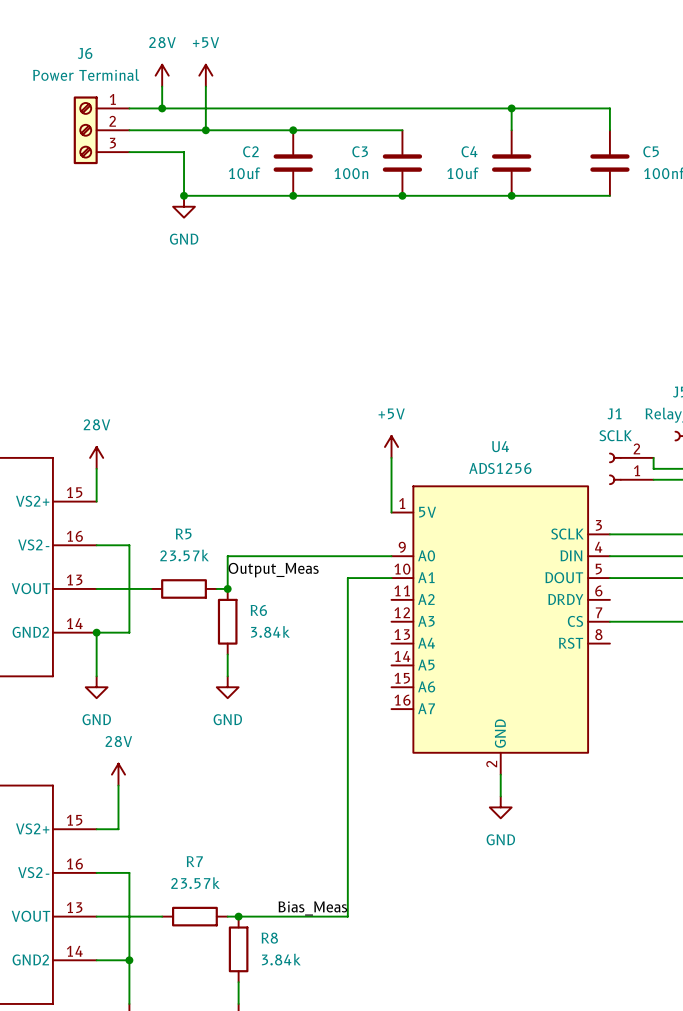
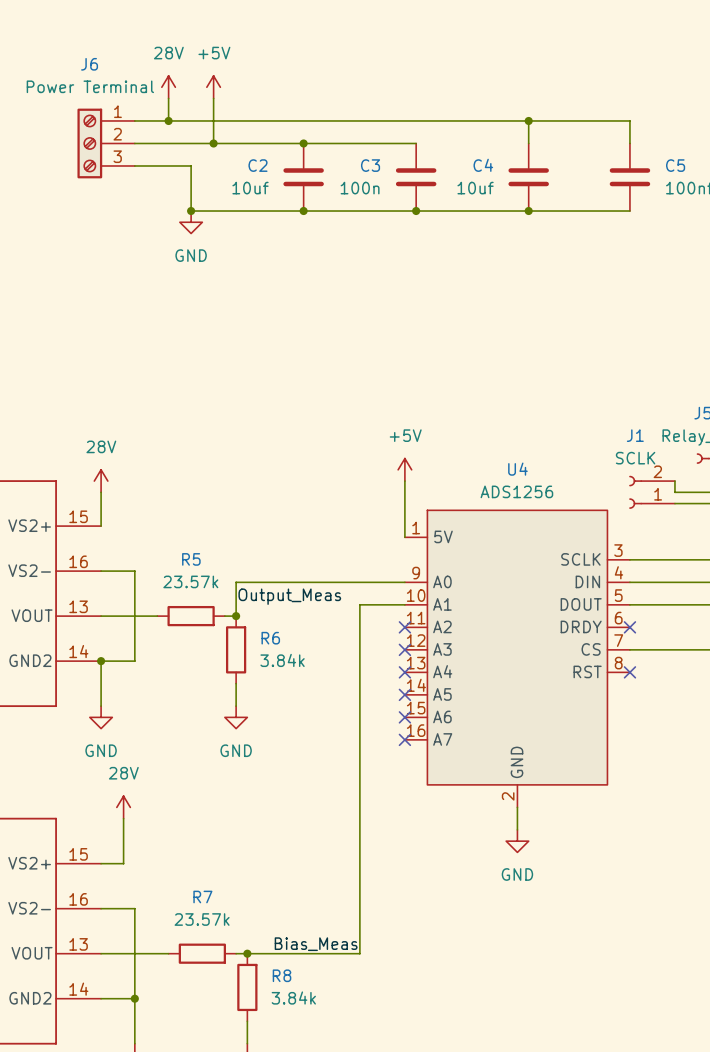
no-connect mark: none -> (404, 627)
no-connect mark: none -> (629, 627)
no-connect mark: none -> (404, 649)
no-connect mark: none -> (404, 672)
no-connect mark: none -> (629, 672)
no-connect mark: none -> (404, 694)
no-connect mark: none -> (404, 717)
no-connect mark: none -> (404, 739)

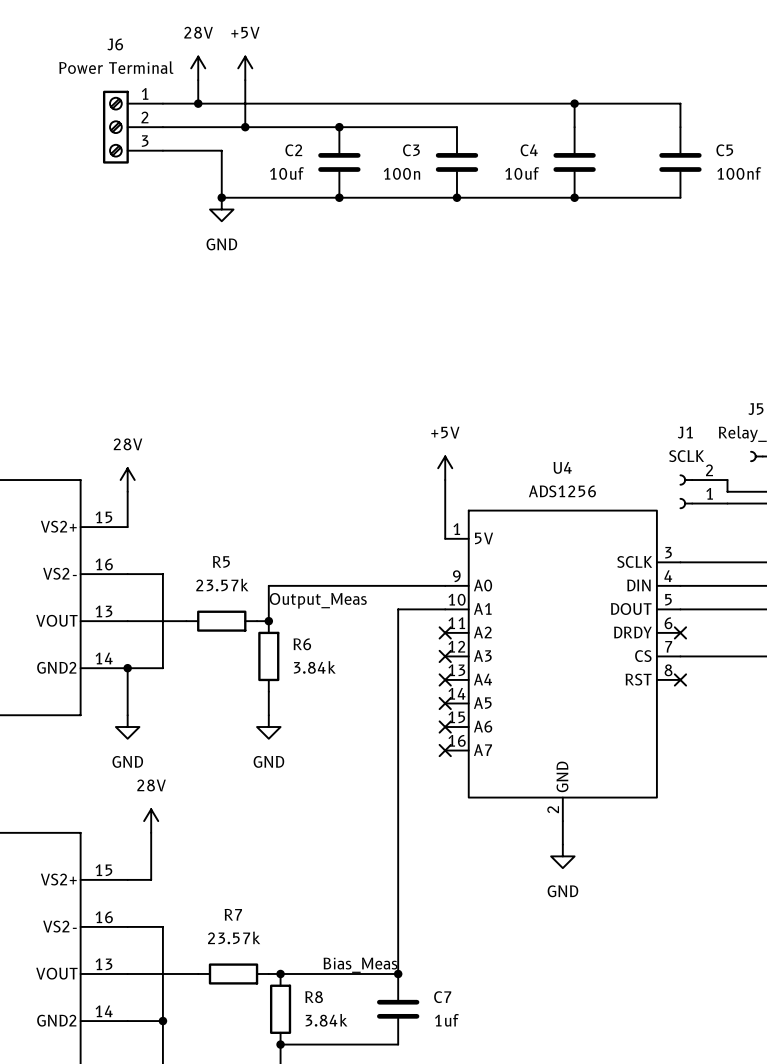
junction: none -> (398, 973)
C7: none -> 1uf (398, 1009)
wire: none -> (280, 1044) (398, 1044)
junction: none -> (280, 1044)

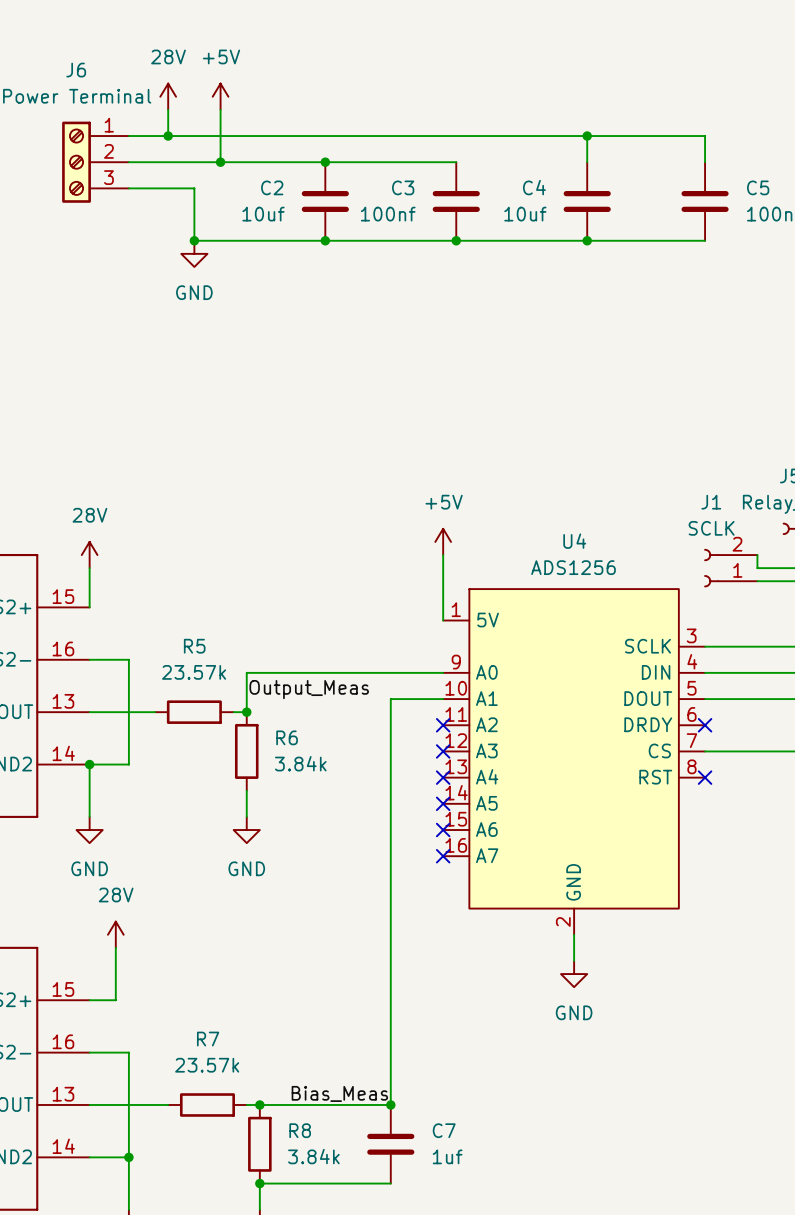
C3 value: 100n (401, 173) -> 100nf (388, 214)

